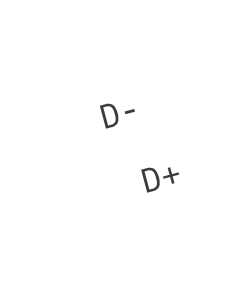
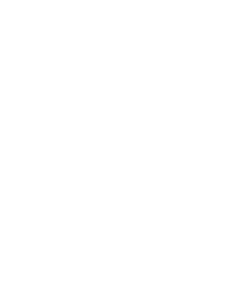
text: D- (117, 115) -> none
text: D+ (160, 179) -> none

